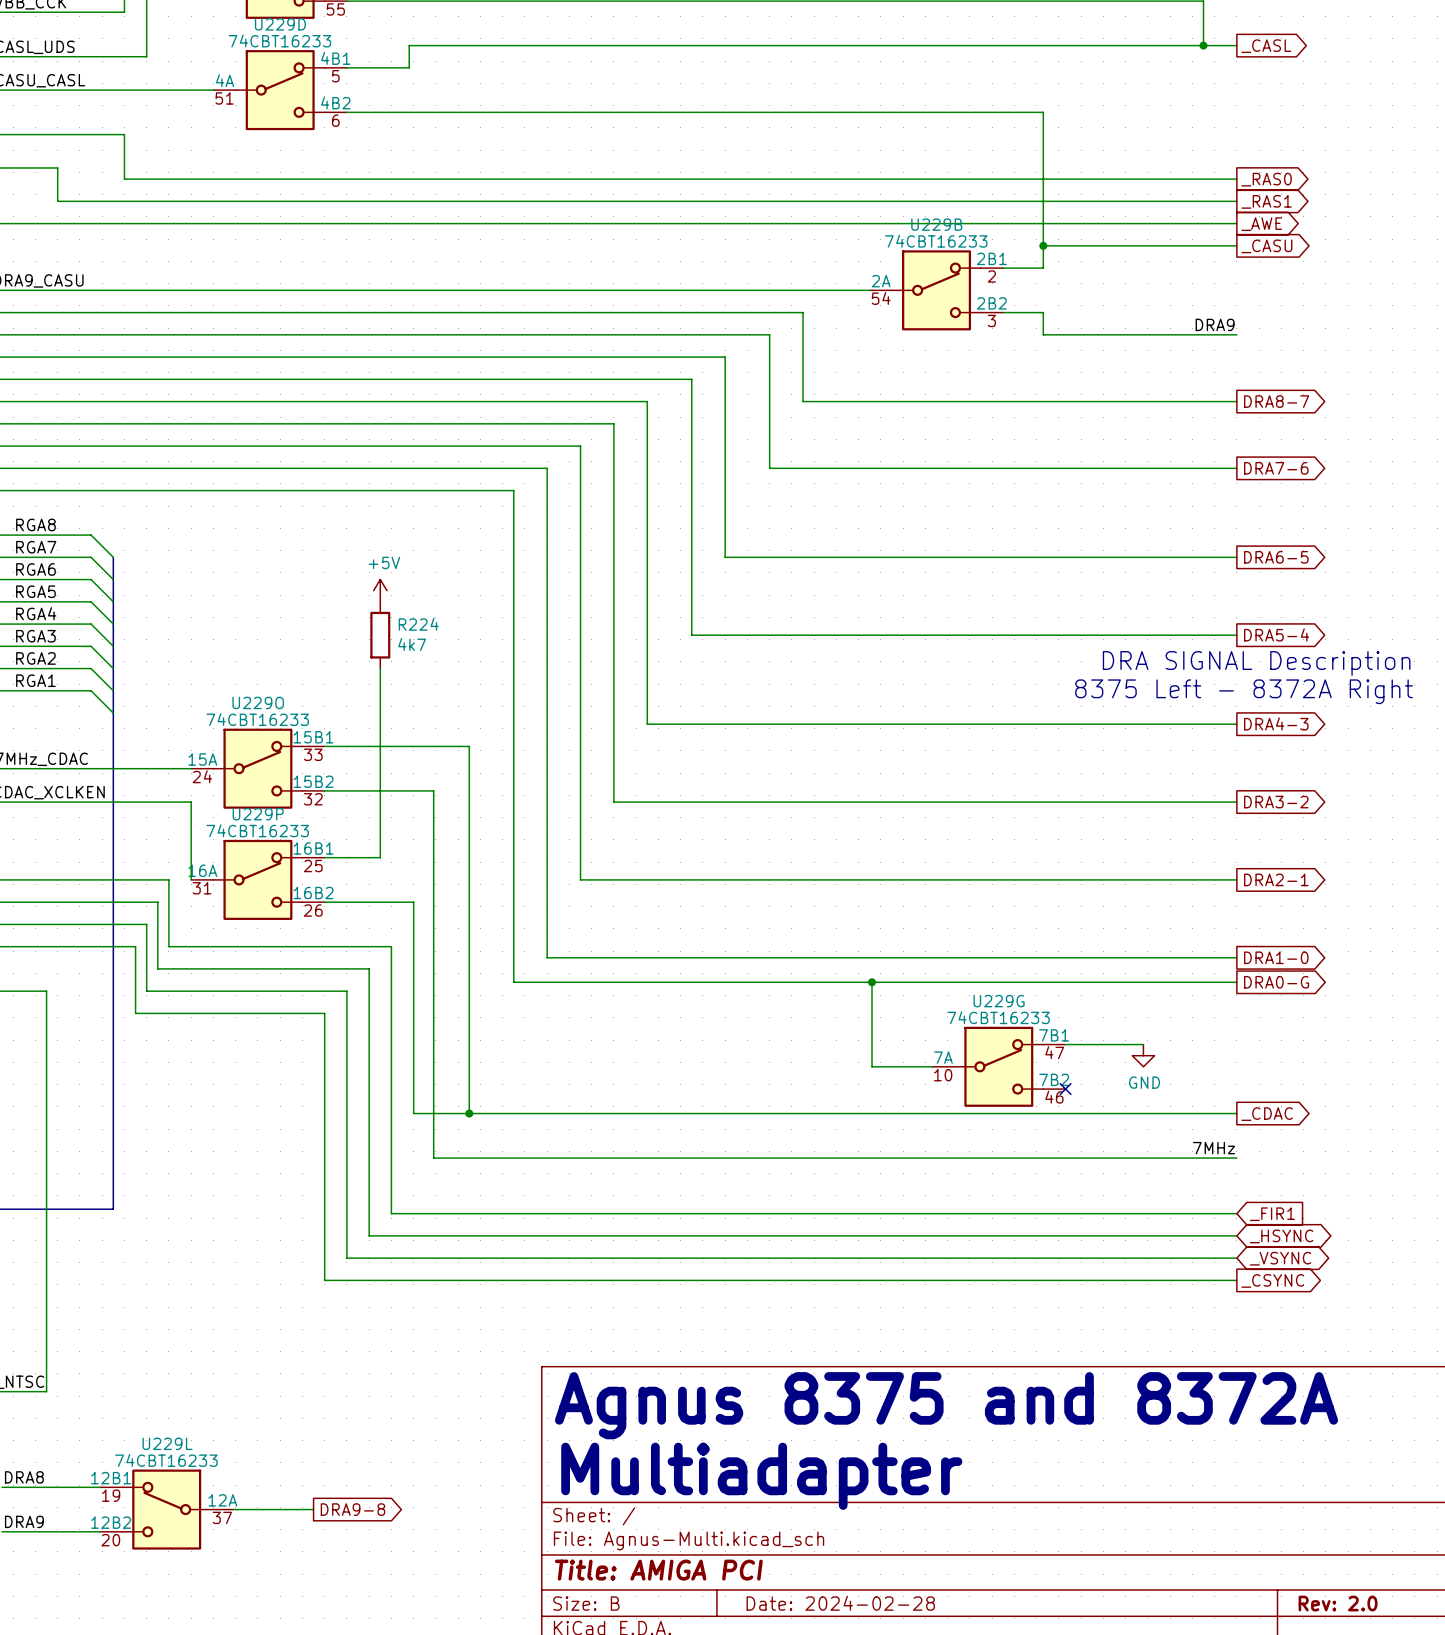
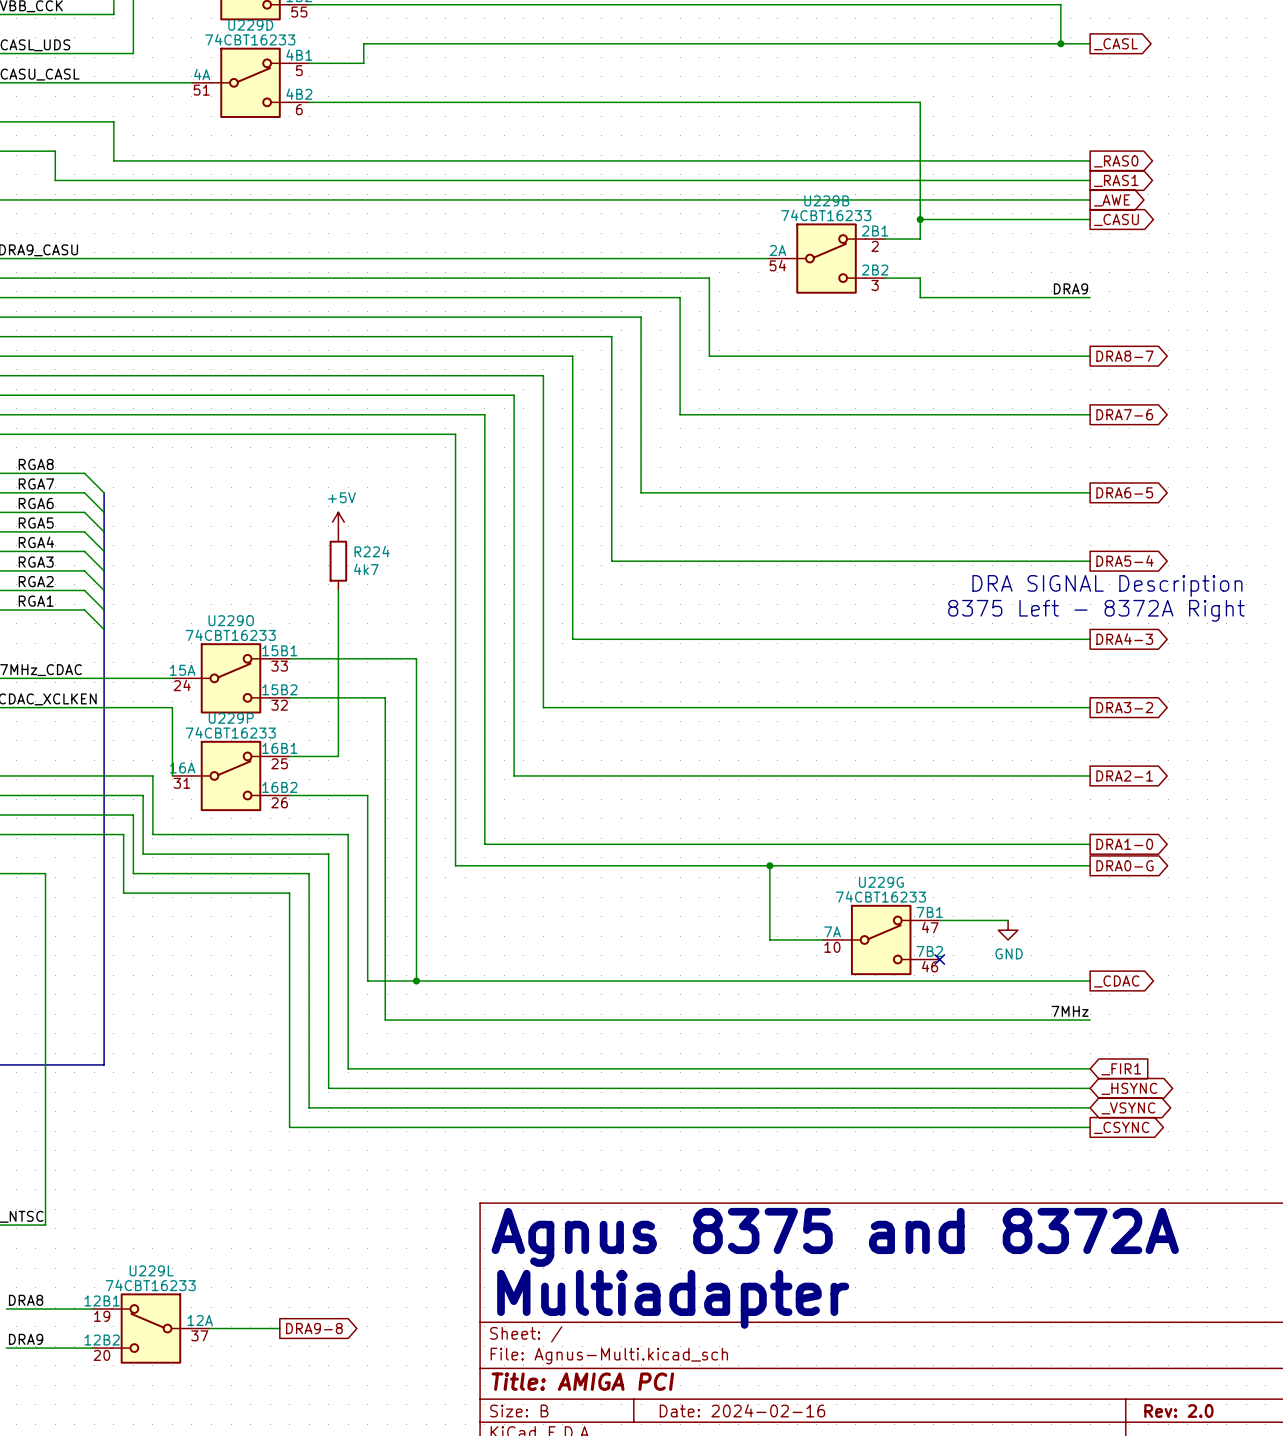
title block: Date: 2024-02-28 (840, 1603) -> Date: 2024-02-16 (742, 1410)

